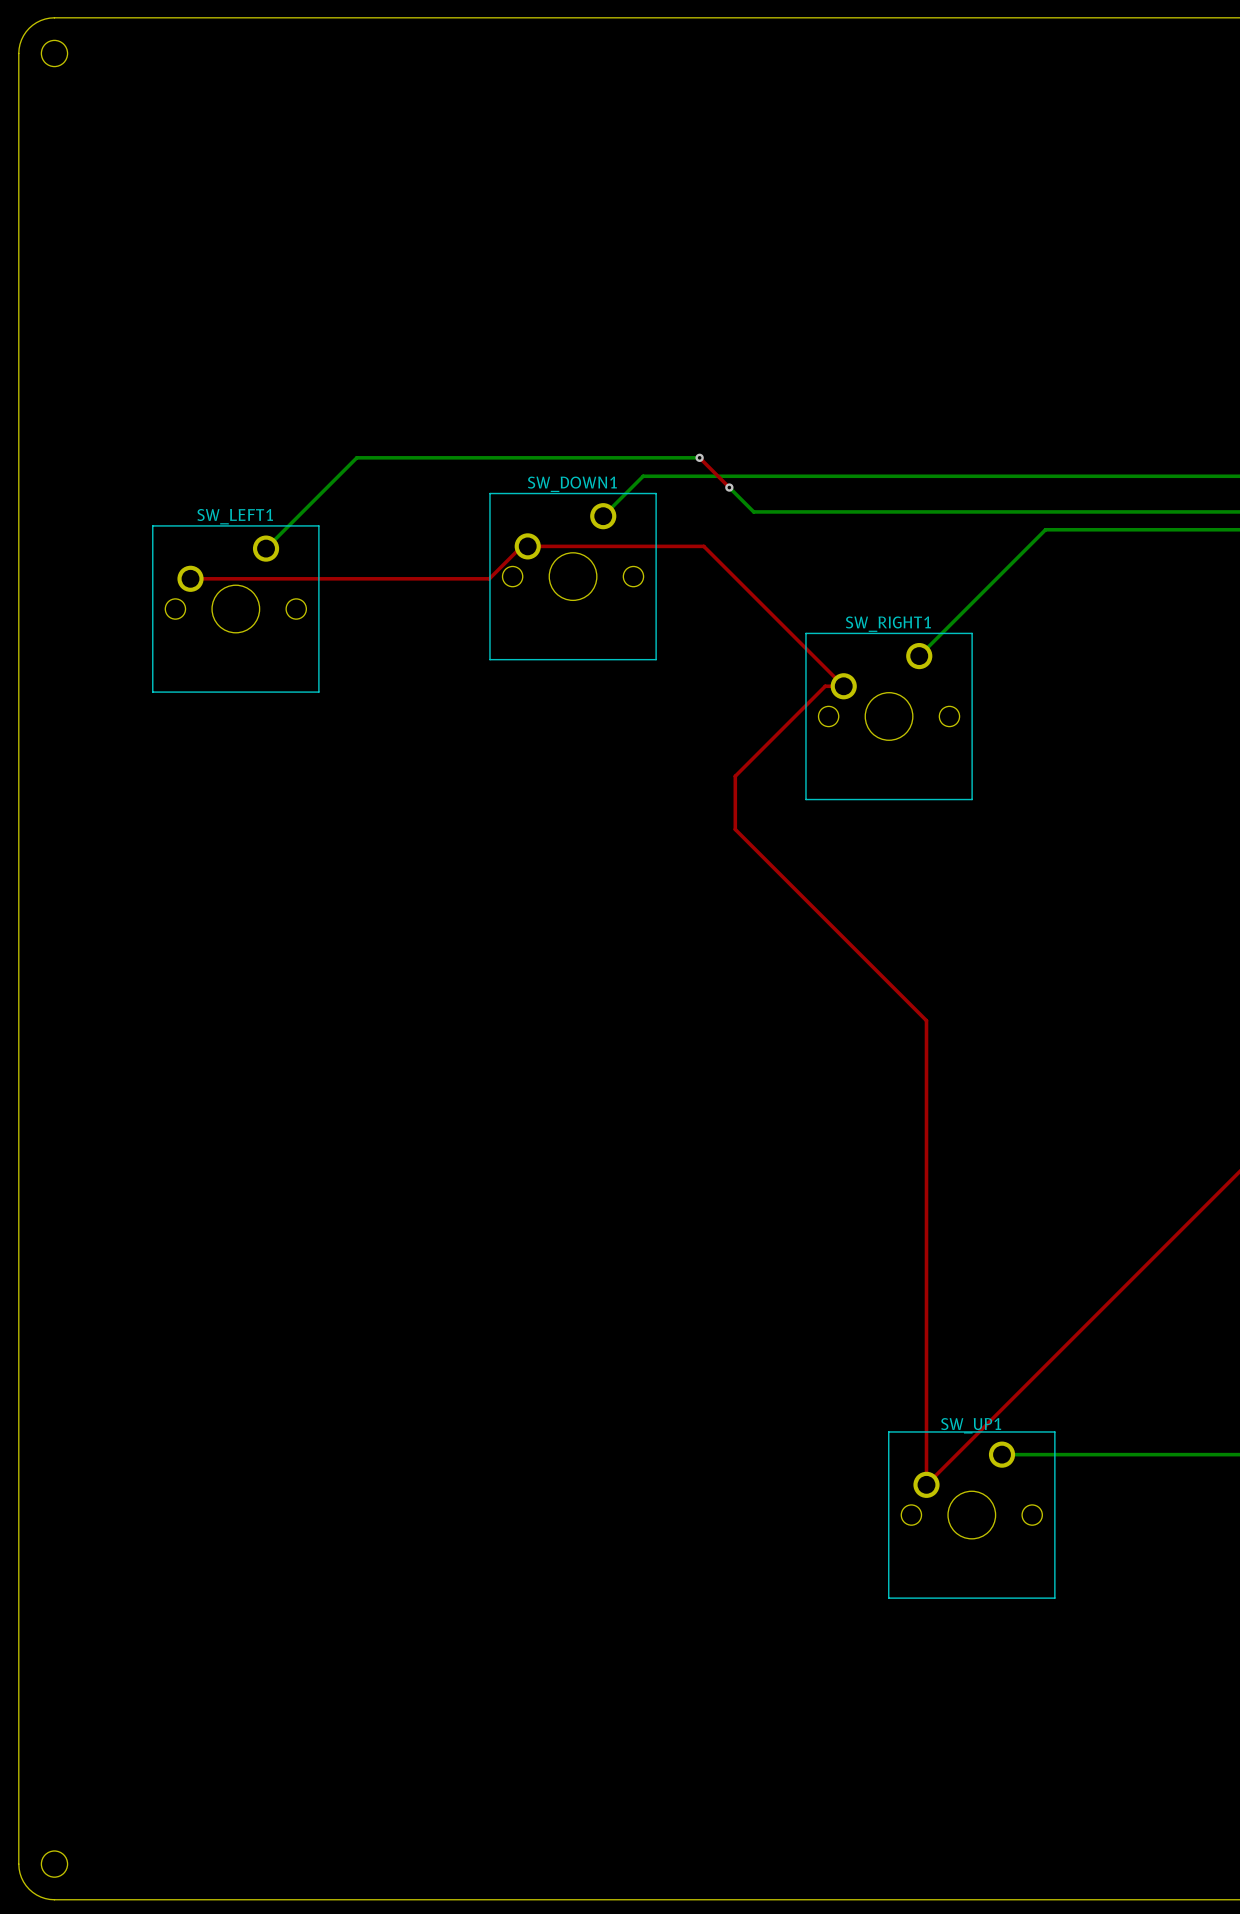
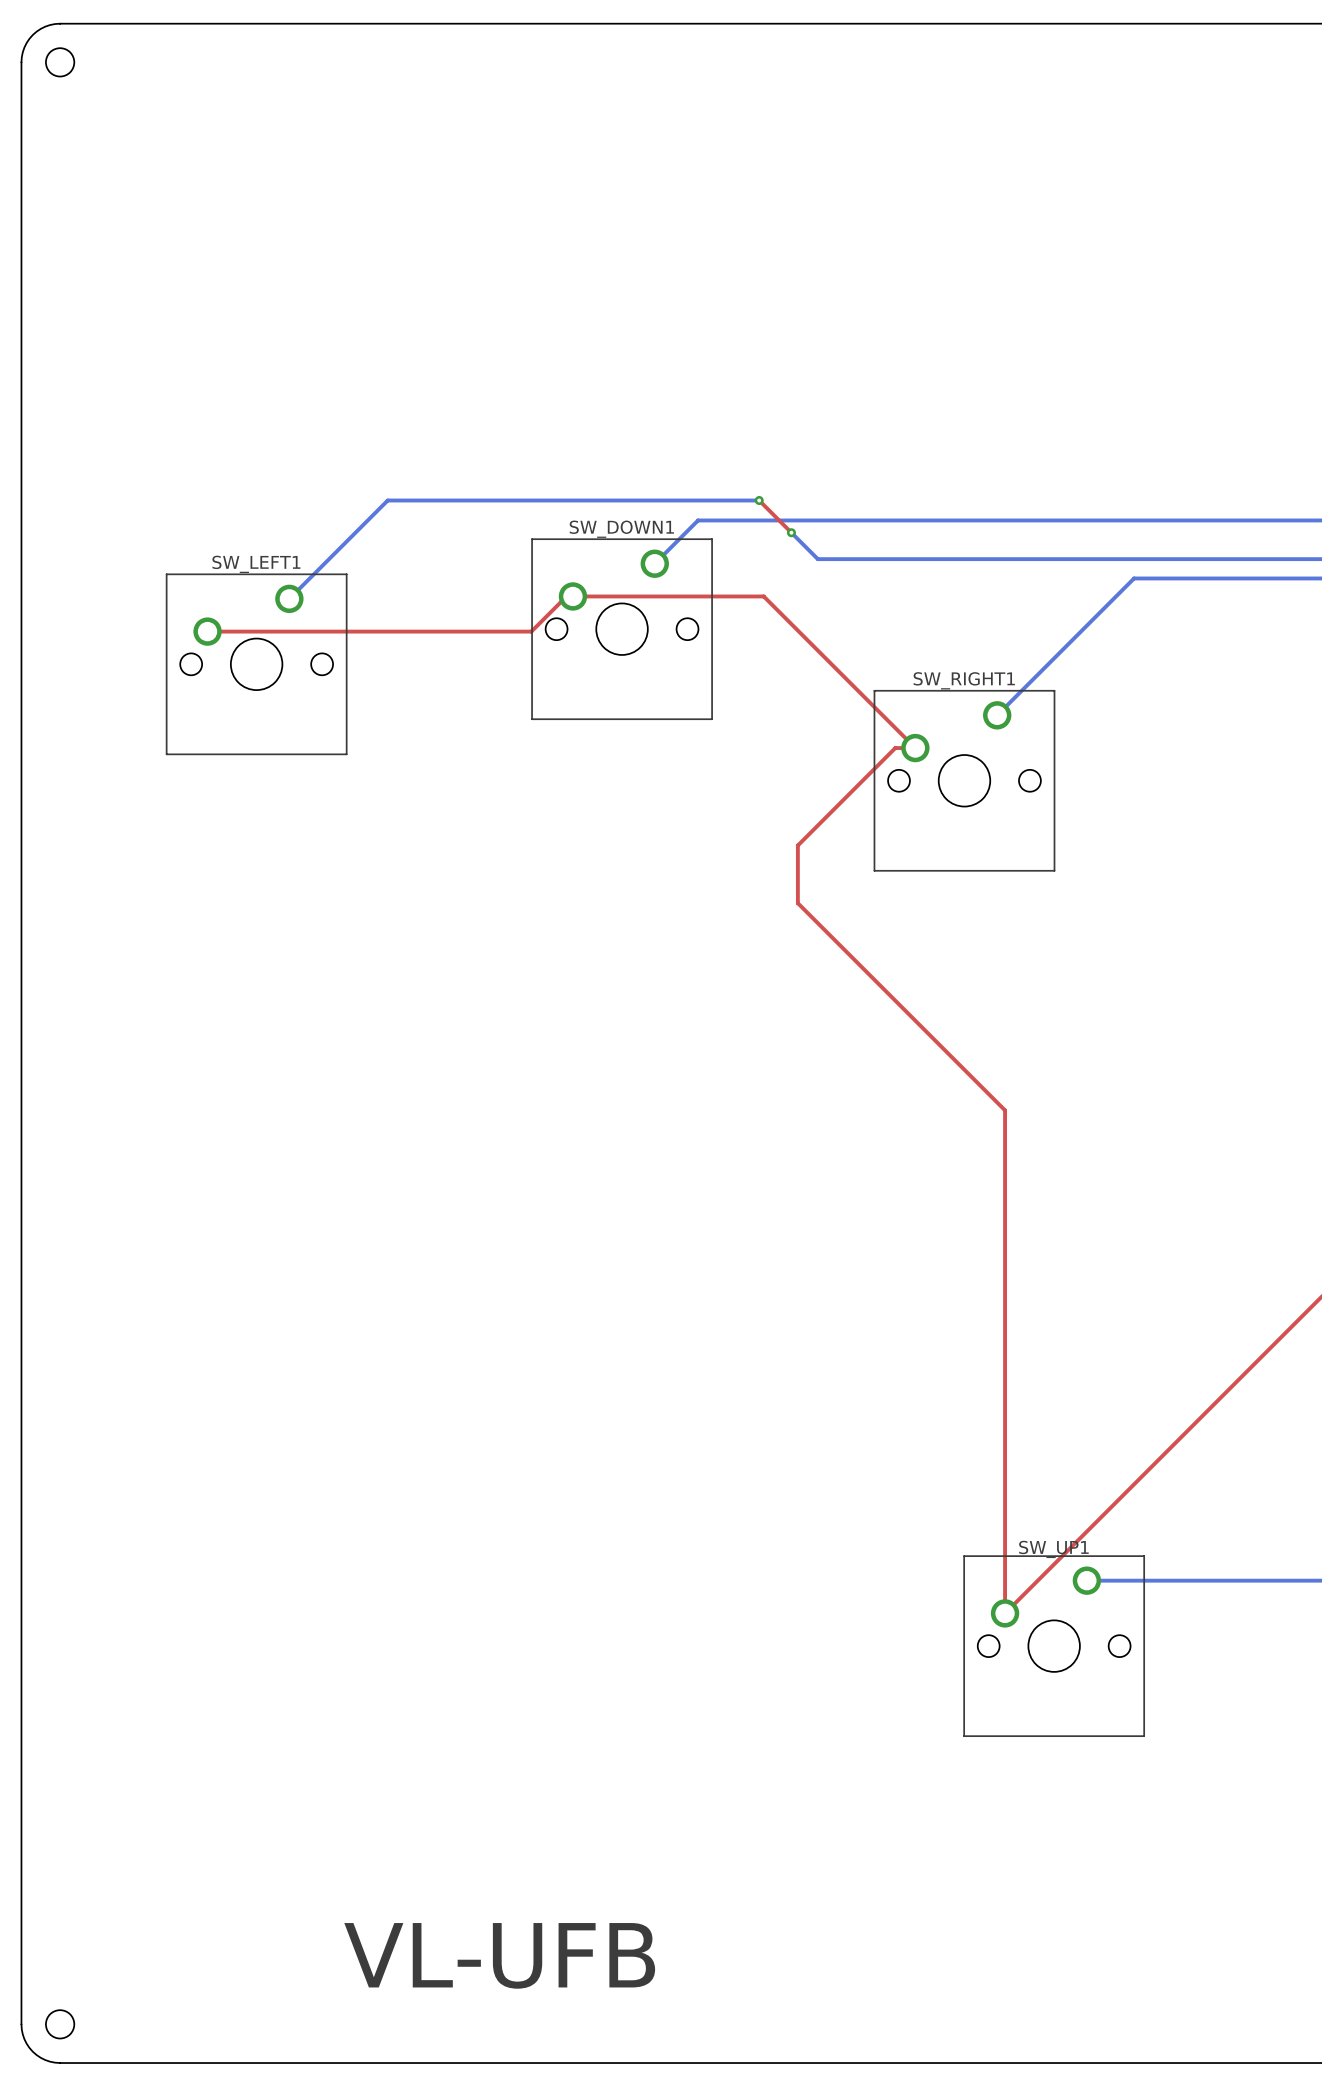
text: none -> VL-UFB (499, 1955)

